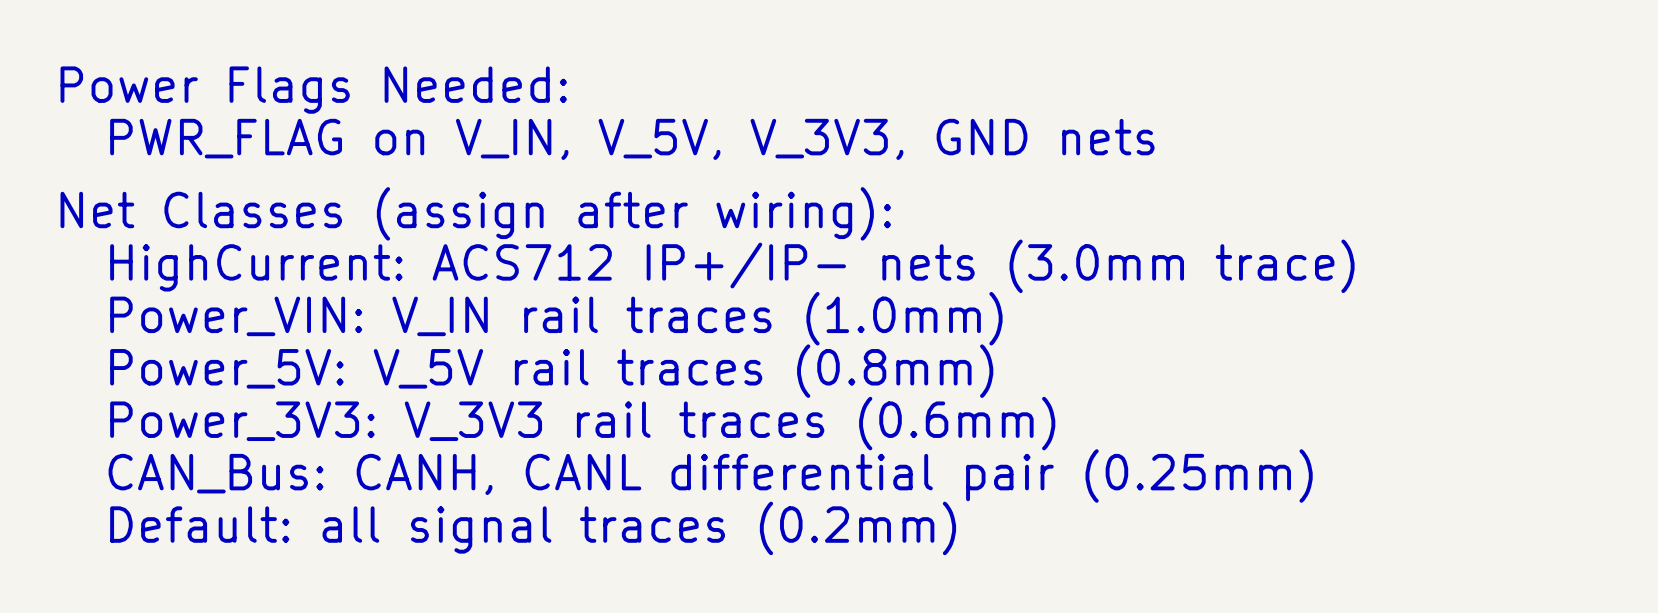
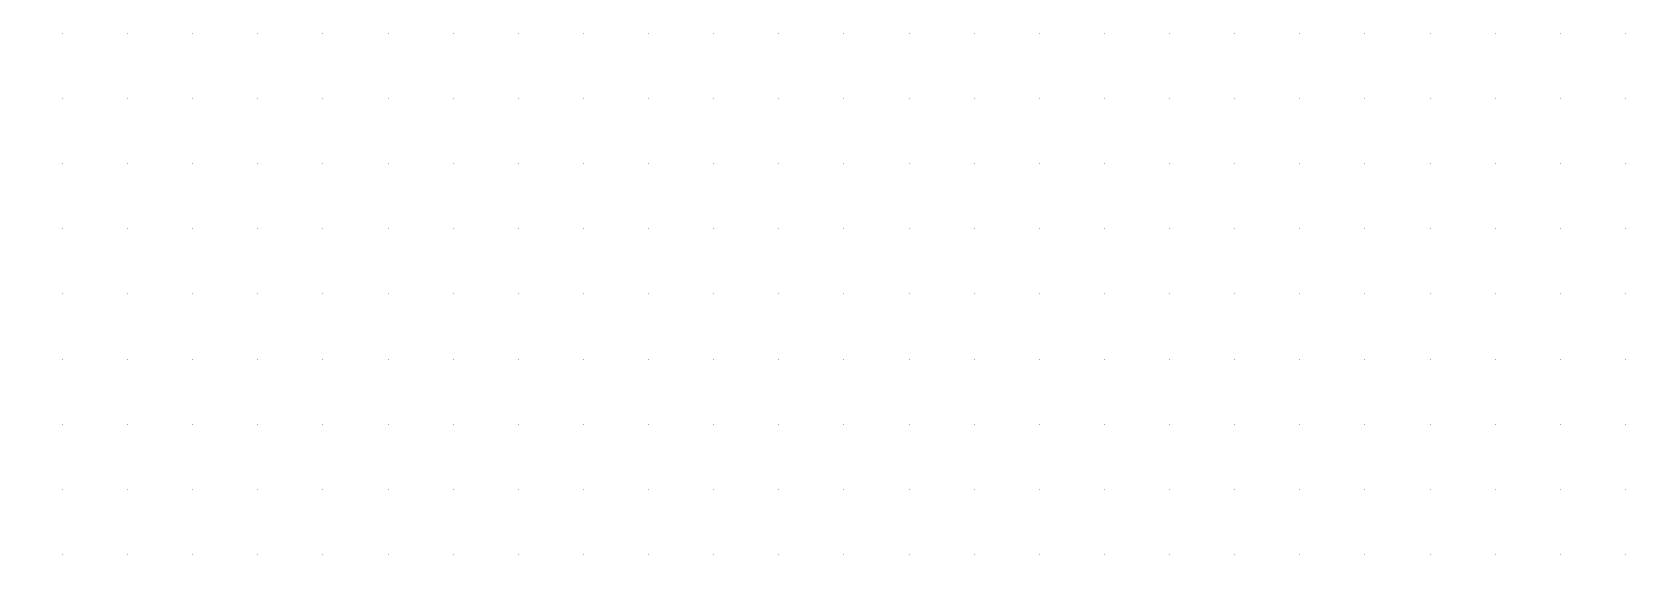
text: Power Flags Needed: (313, 90) -> none
text: PWR_FLAG on V_IN, V_5V, V_3V3, GND nets (632, 139) -> none
text: Net Classes (assign after wiring): (475, 213) -> none
text: HighCurrent: ACS712 IP+/IP- nets (3.0mm trace) (732, 266) -> none
text: Power_VIN: V_IN rail traces (1.0mm) (556, 318) -> none
text: Power_5V: V_5V rail traces (0.8mm) (551, 371) -> none
text: Power_3V3: V_3V3 rail traces (0.6mm) (582, 423) -> none
text: CAN_Bus: CANH, CANL differential pair (0.25mm) (710, 476) -> none
text: Default: all signal traces (0.2mm) (533, 528) -> none

